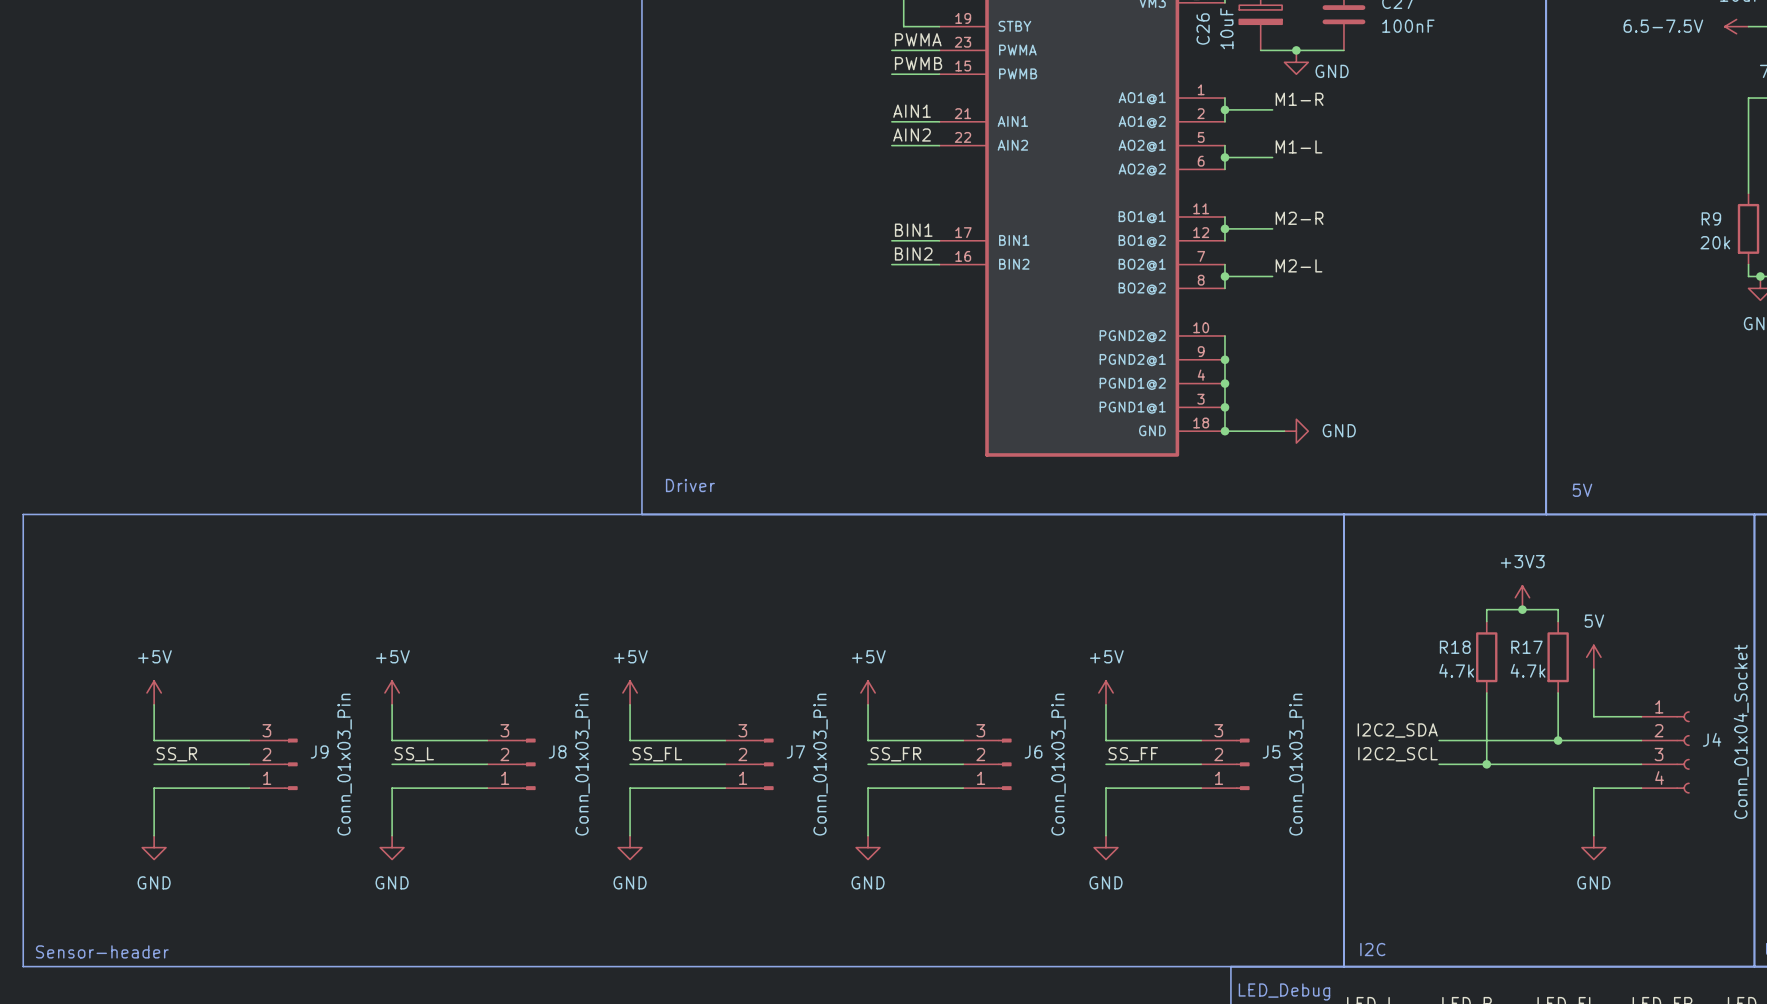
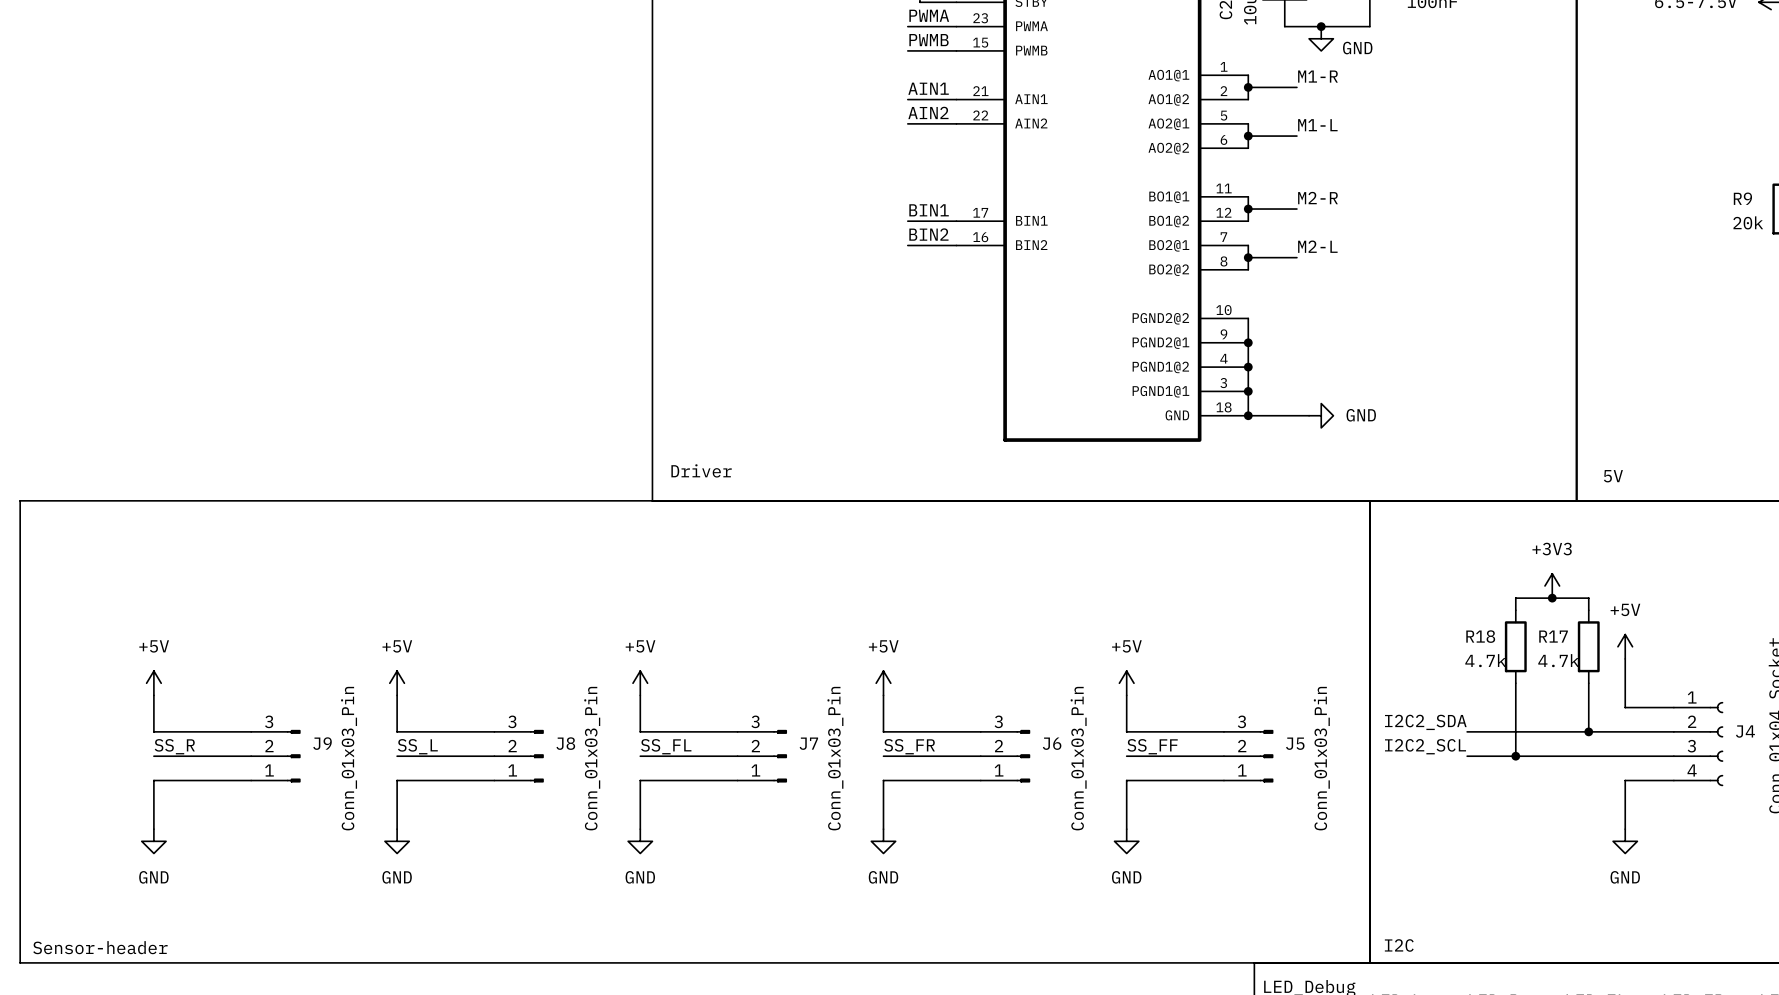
power symbol: 5V (1593, 657) -> +5V (1625, 646)

